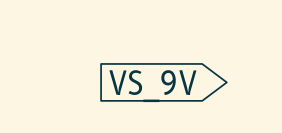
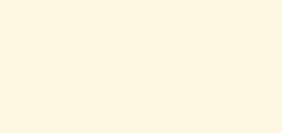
global label: VS_9V (152, 86) -> none

